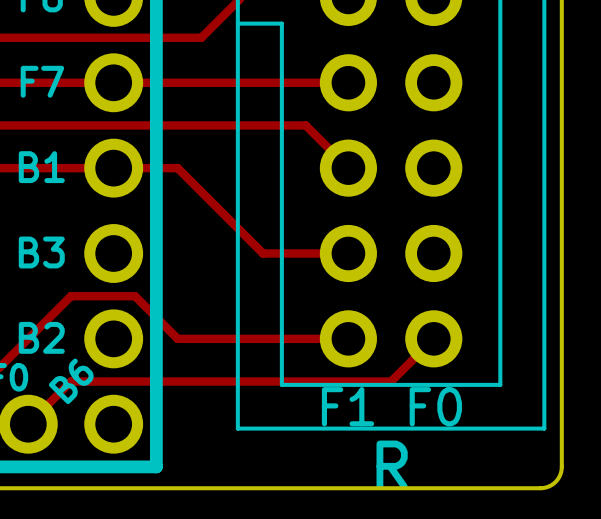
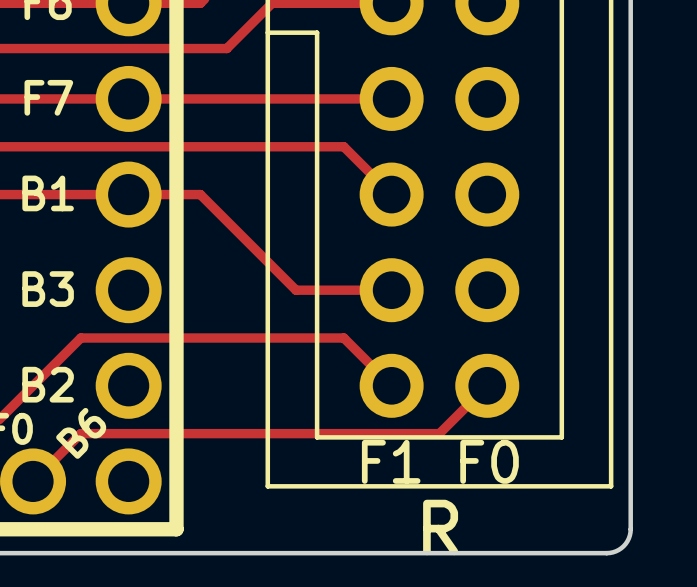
track: (135, 296) (177, 338) (348, 338) -> (152, 338) (343, 338) (391, 385)

